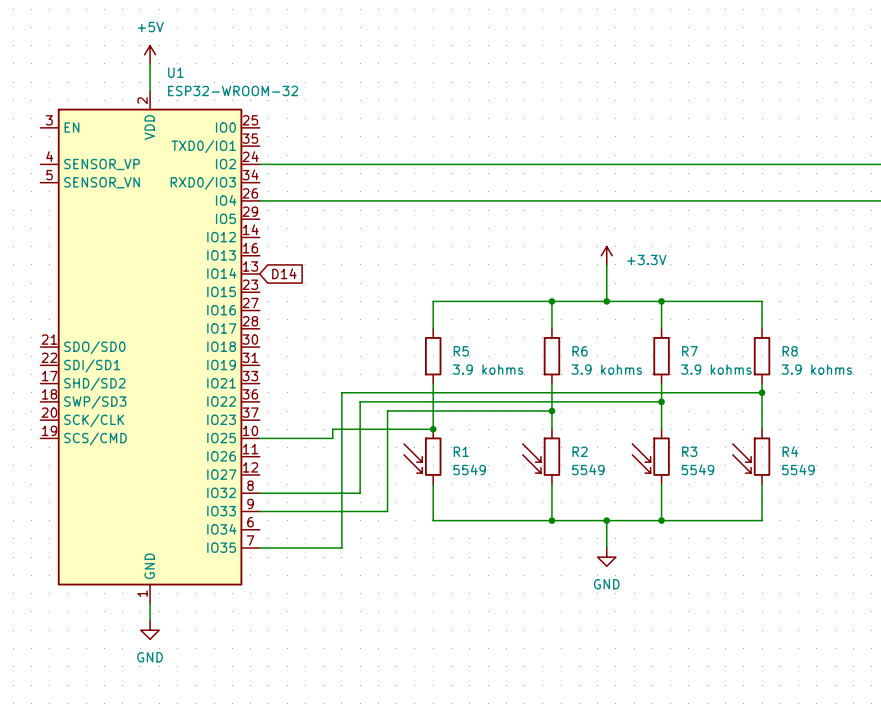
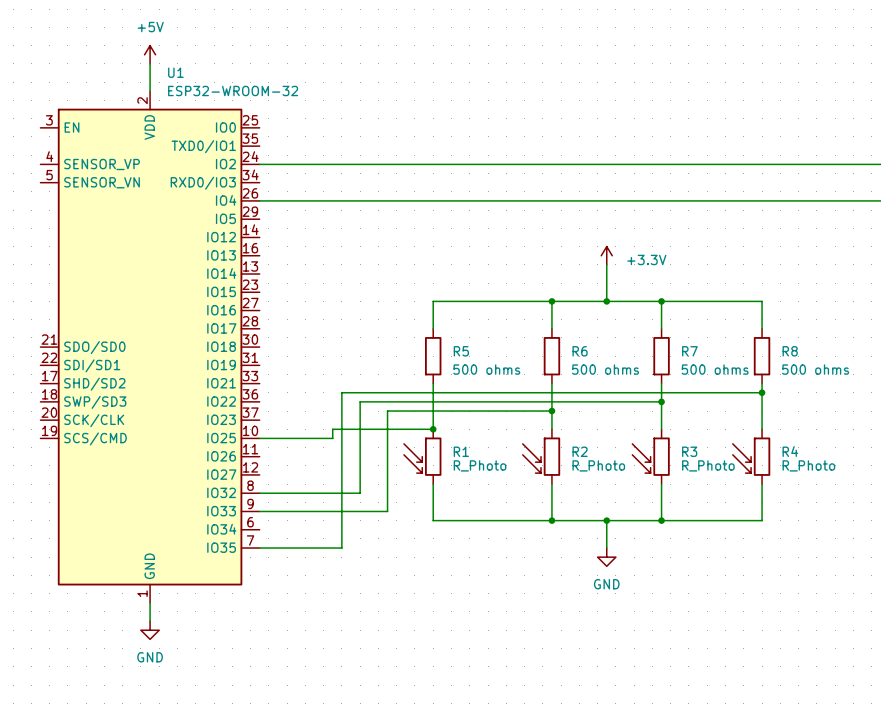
global label: D14 (284, 273) -> none
R5 value: 3.9 kohms (488, 369) -> 500 ohms (486, 369)
R6 value: 3.9 kohms (606, 369) -> 500 ohms (605, 369)
R7 value: 3.9 kohms (716, 369) -> 500 ohms (715, 369)
R8 value: 3.9 kohms (816, 369) -> 500 ohms (815, 369)
R1 value: 5549 (469, 469) -> R_Photo (480, 465)
R2 value: 5549 (588, 469) -> R_Photo (598, 465)
R3 value: 5549 (697, 469) -> R_Photo (708, 465)
R4 value: 5549 (798, 469) -> R_Photo (808, 465)

